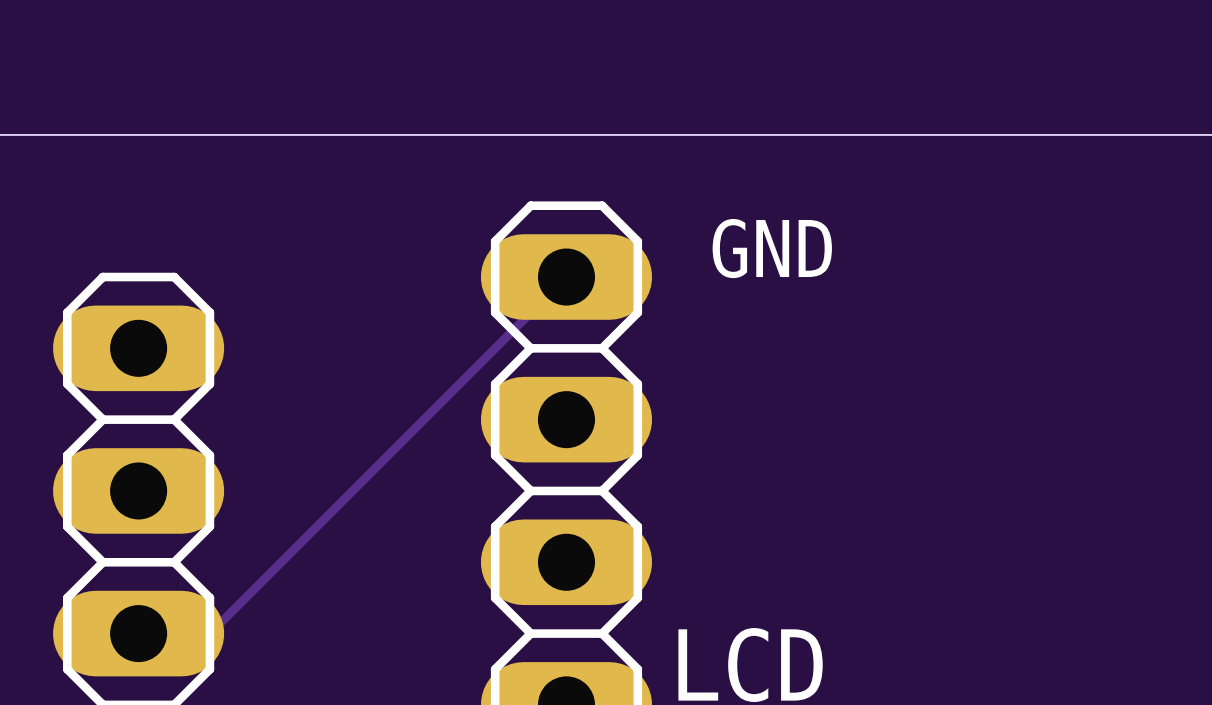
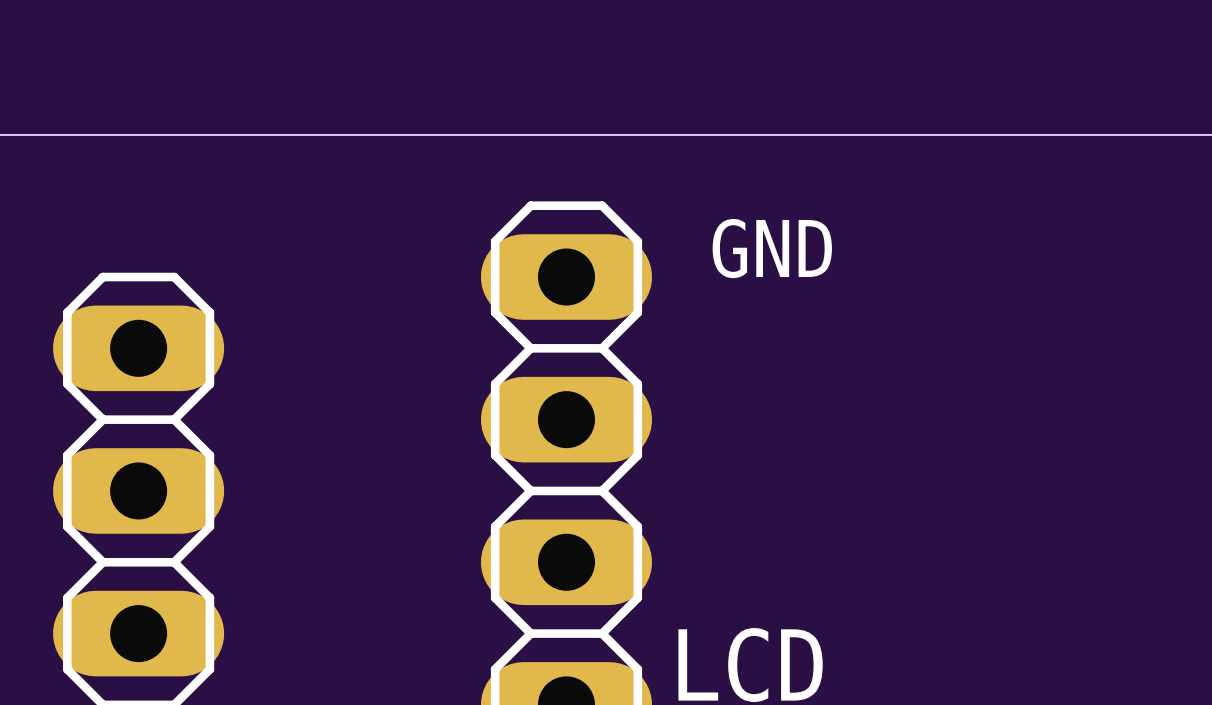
track: (566, 277) (209, 633) (138, 633) -> none

